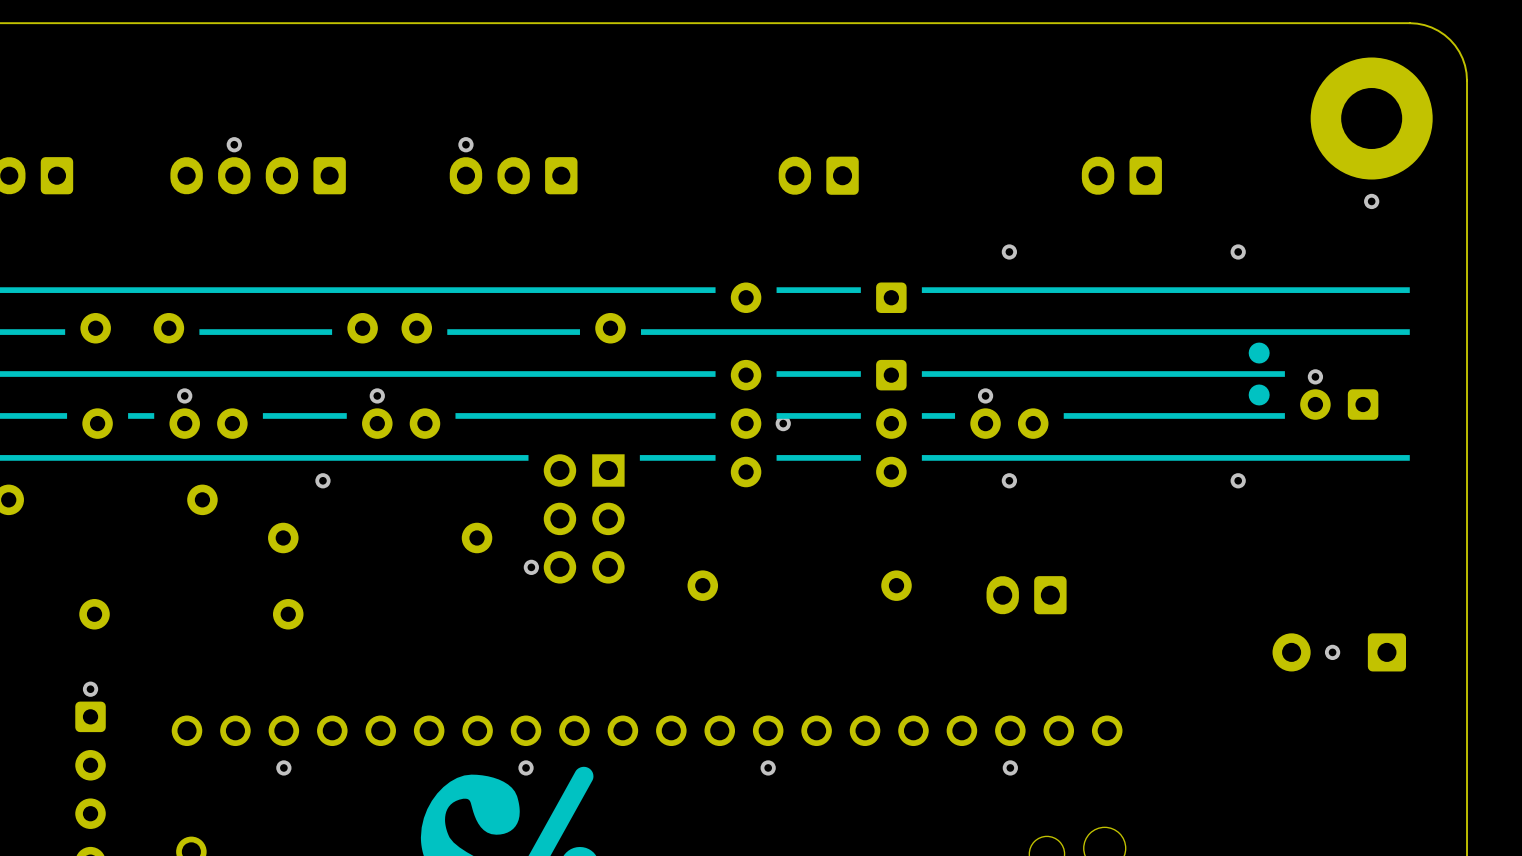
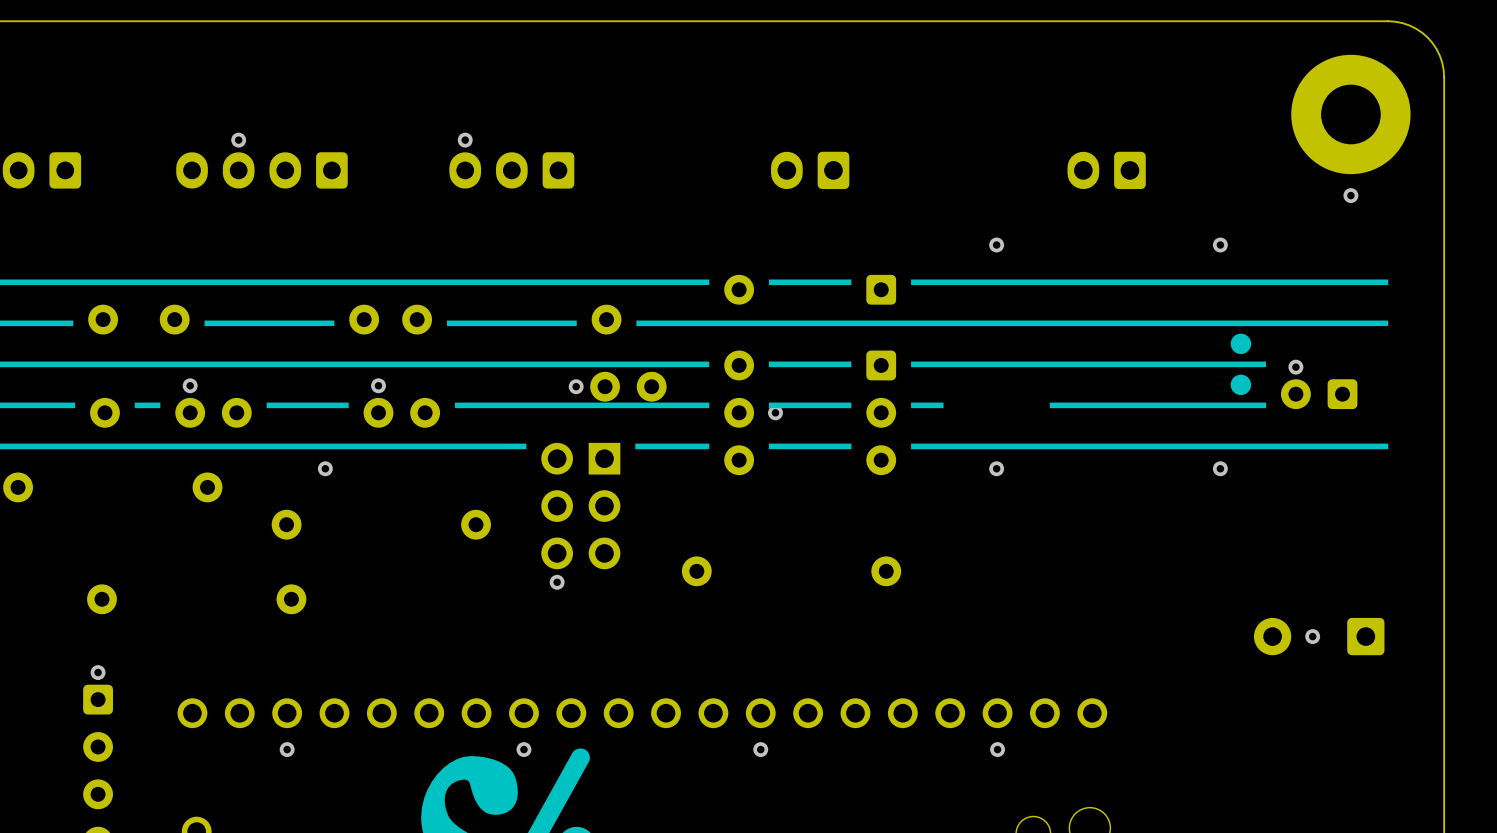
via: (985, 395) -> none
via: none -> (576, 386)
part position: (1009, 423) -> (628, 386)
via position: (531, 567) -> (557, 582)
part: (1026, 595) -> none

